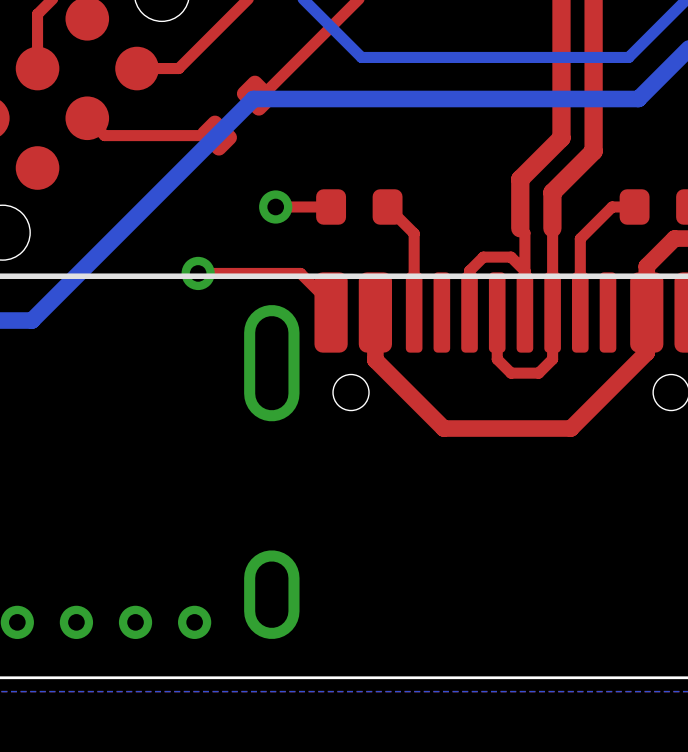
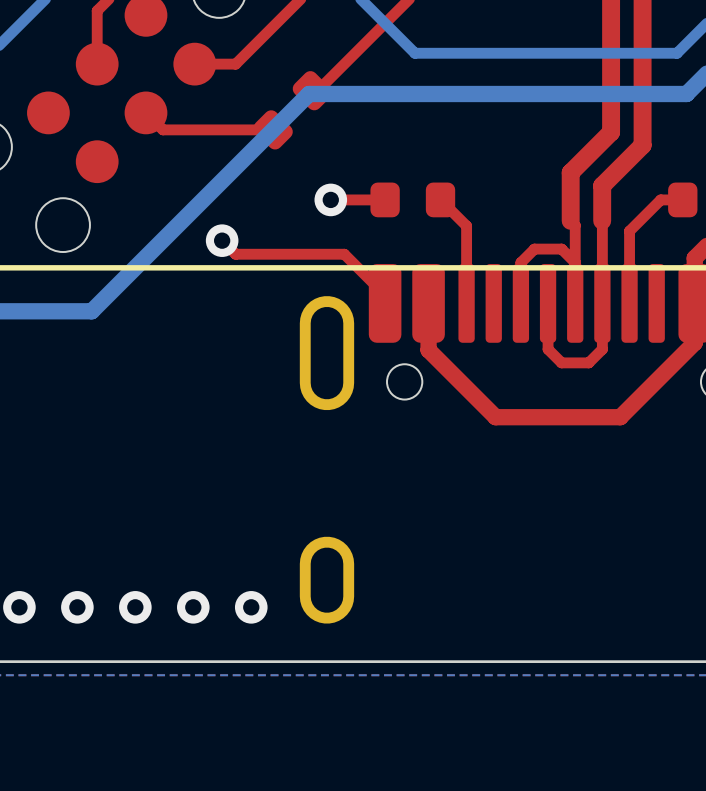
via position: (198, 273) -> (222, 240)
top track: (300, 273) (198, 273) -> (355, 265) (344, 254) (235, 254) (222, 240)

